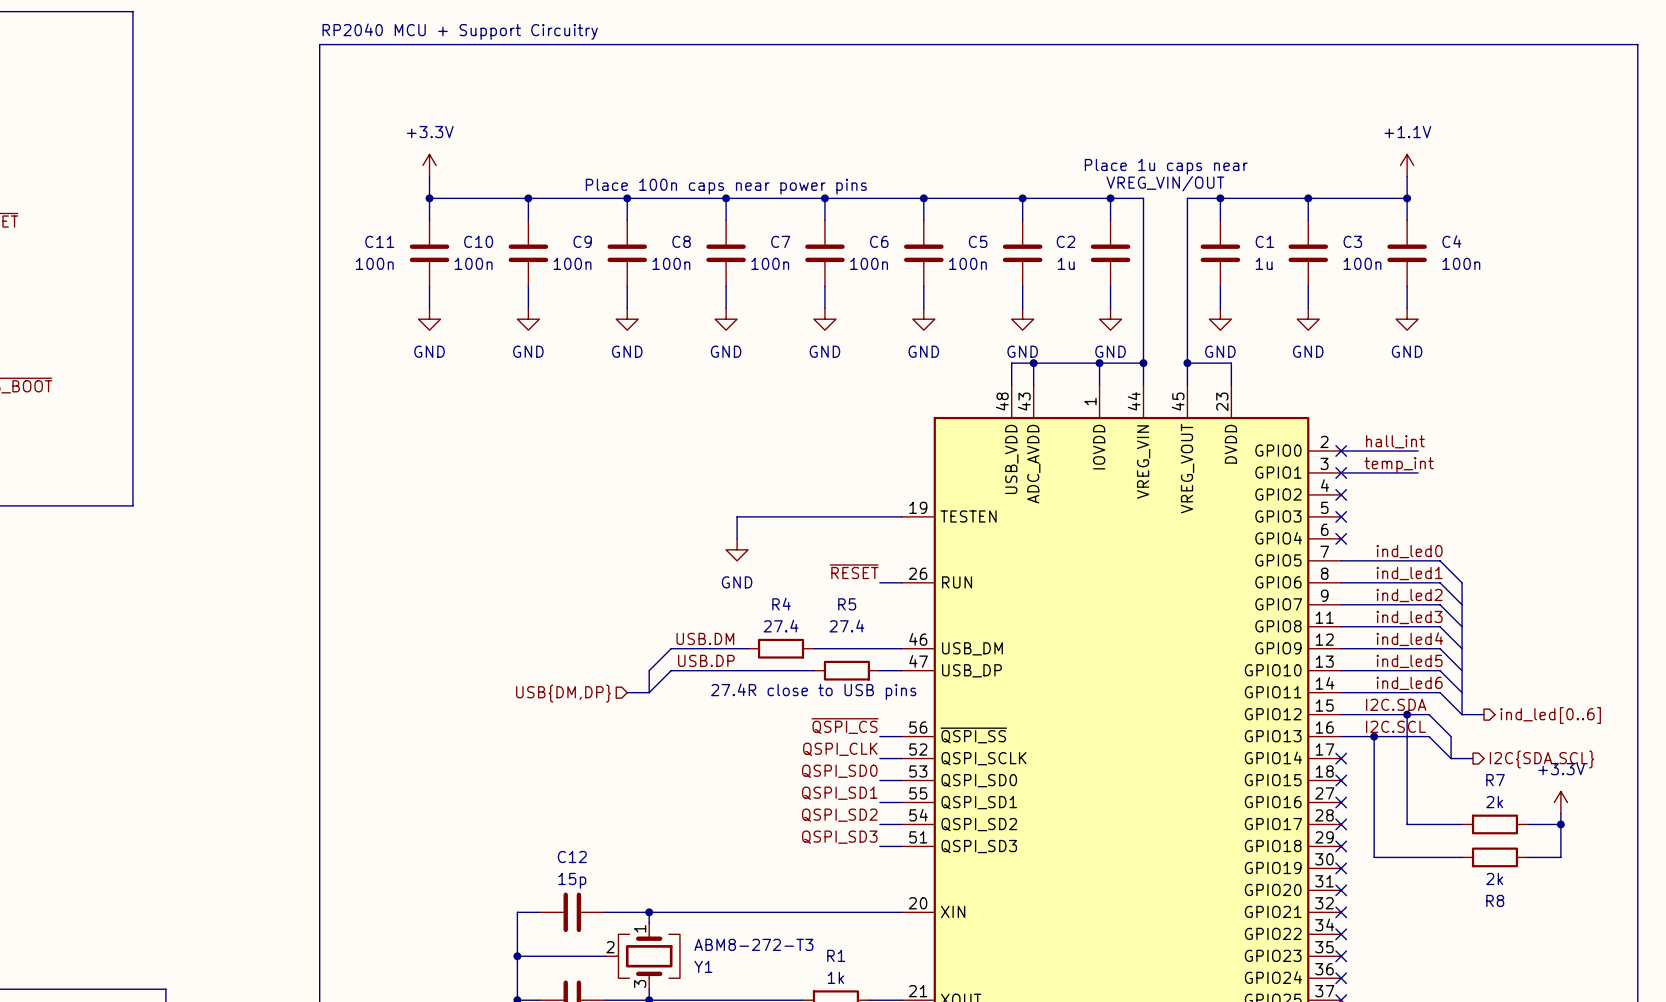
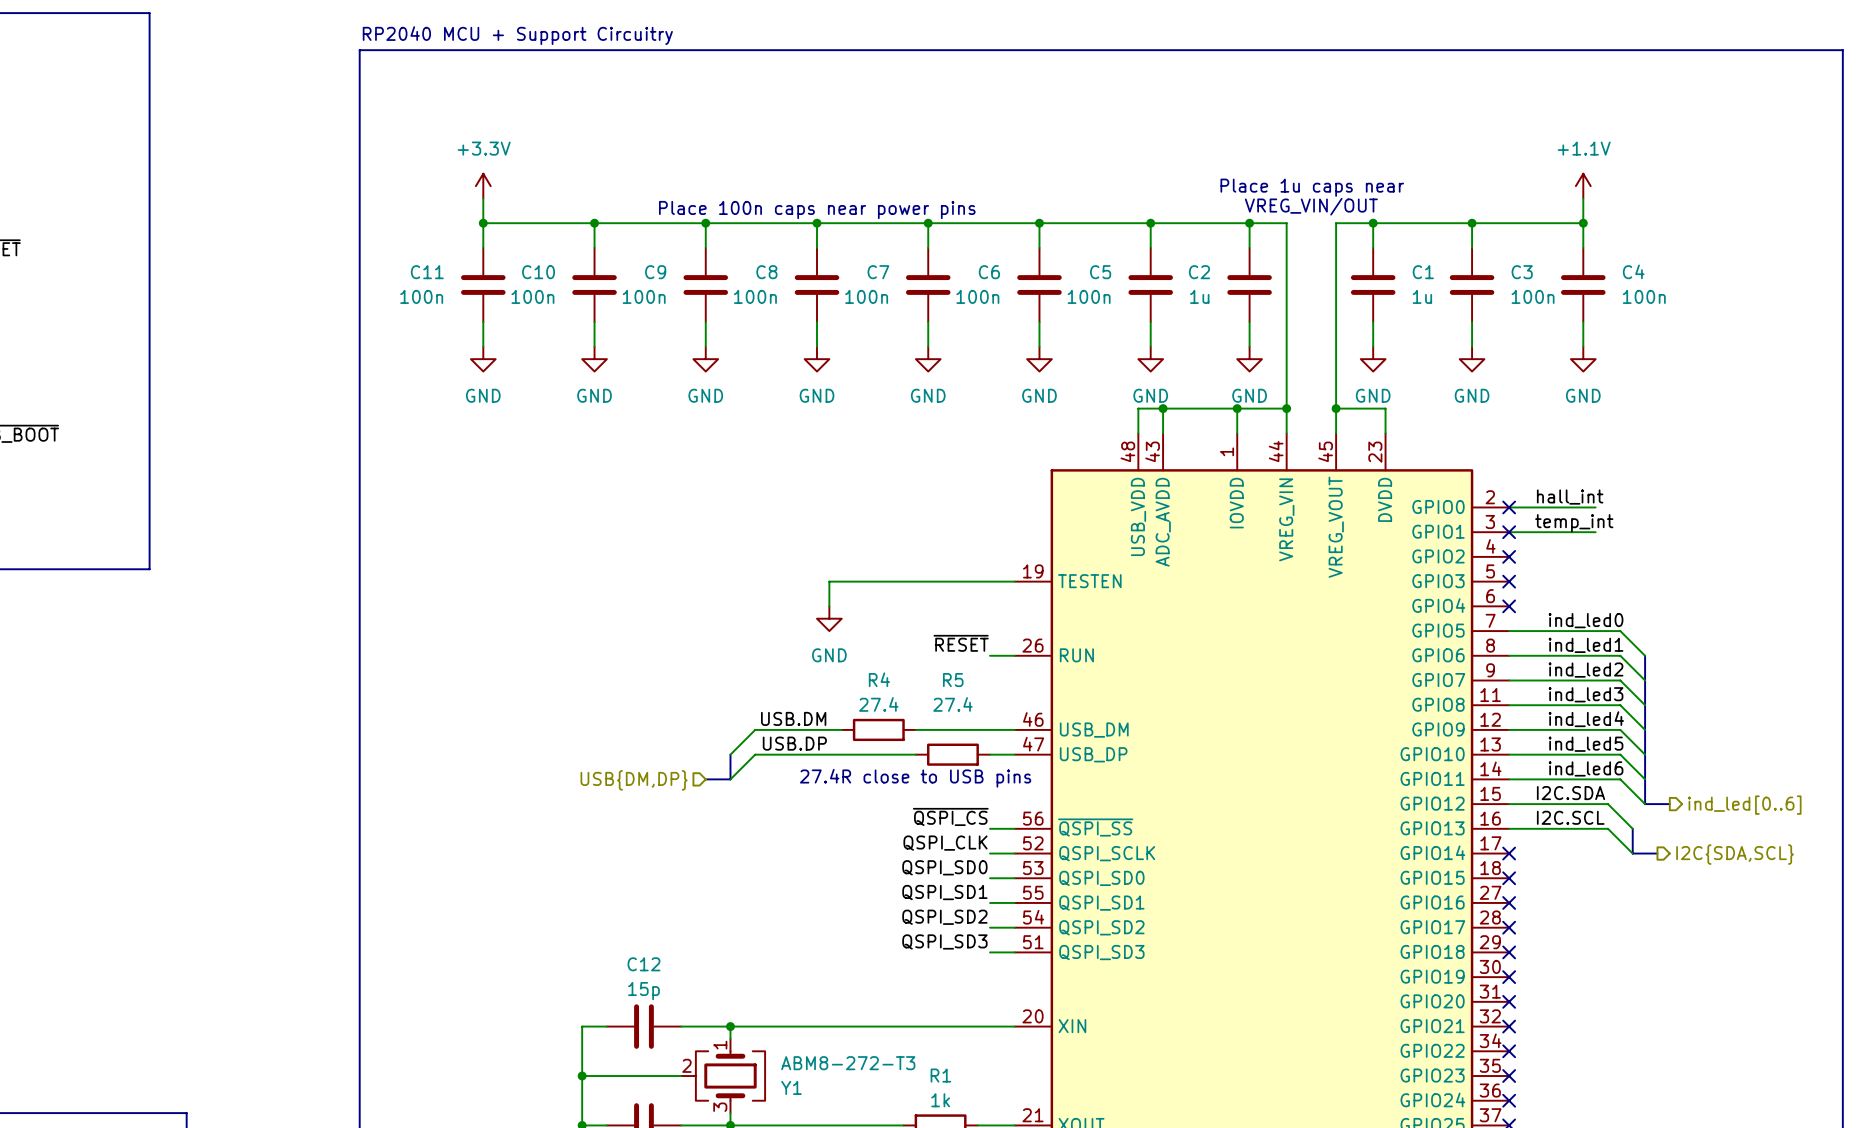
wire: (1407, 714) (1407, 824) (1462, 824) -> none
junction: (1407, 714) -> none
wire: (1374, 736) (1374, 857) (1462, 857) -> none
junction: (1374, 736) -> none
power symbol: +3.3V (1560, 802) -> none
wire: (1560, 813) (1560, 857) (1527, 857) -> none
R7: 2k (1494, 824) -> none
wire: (1527, 824) (1560, 824) -> none
junction: (1560, 824) -> none
R8: 2k (1494, 857) -> none

